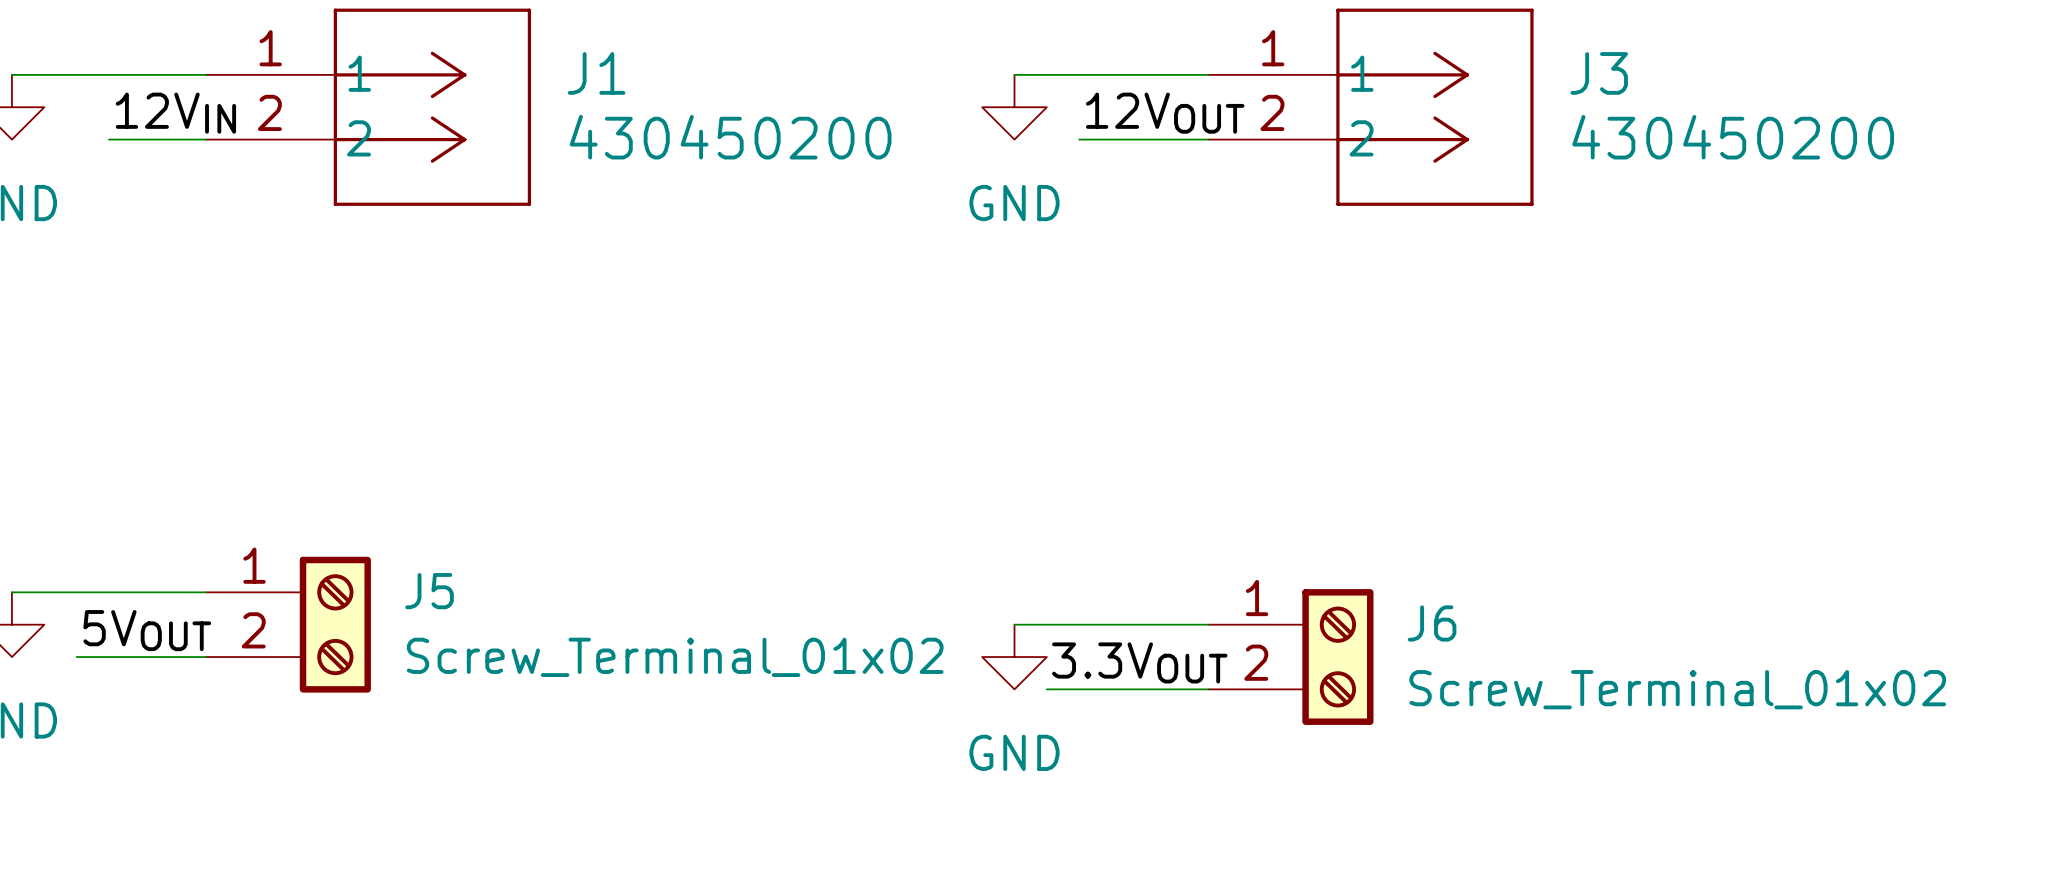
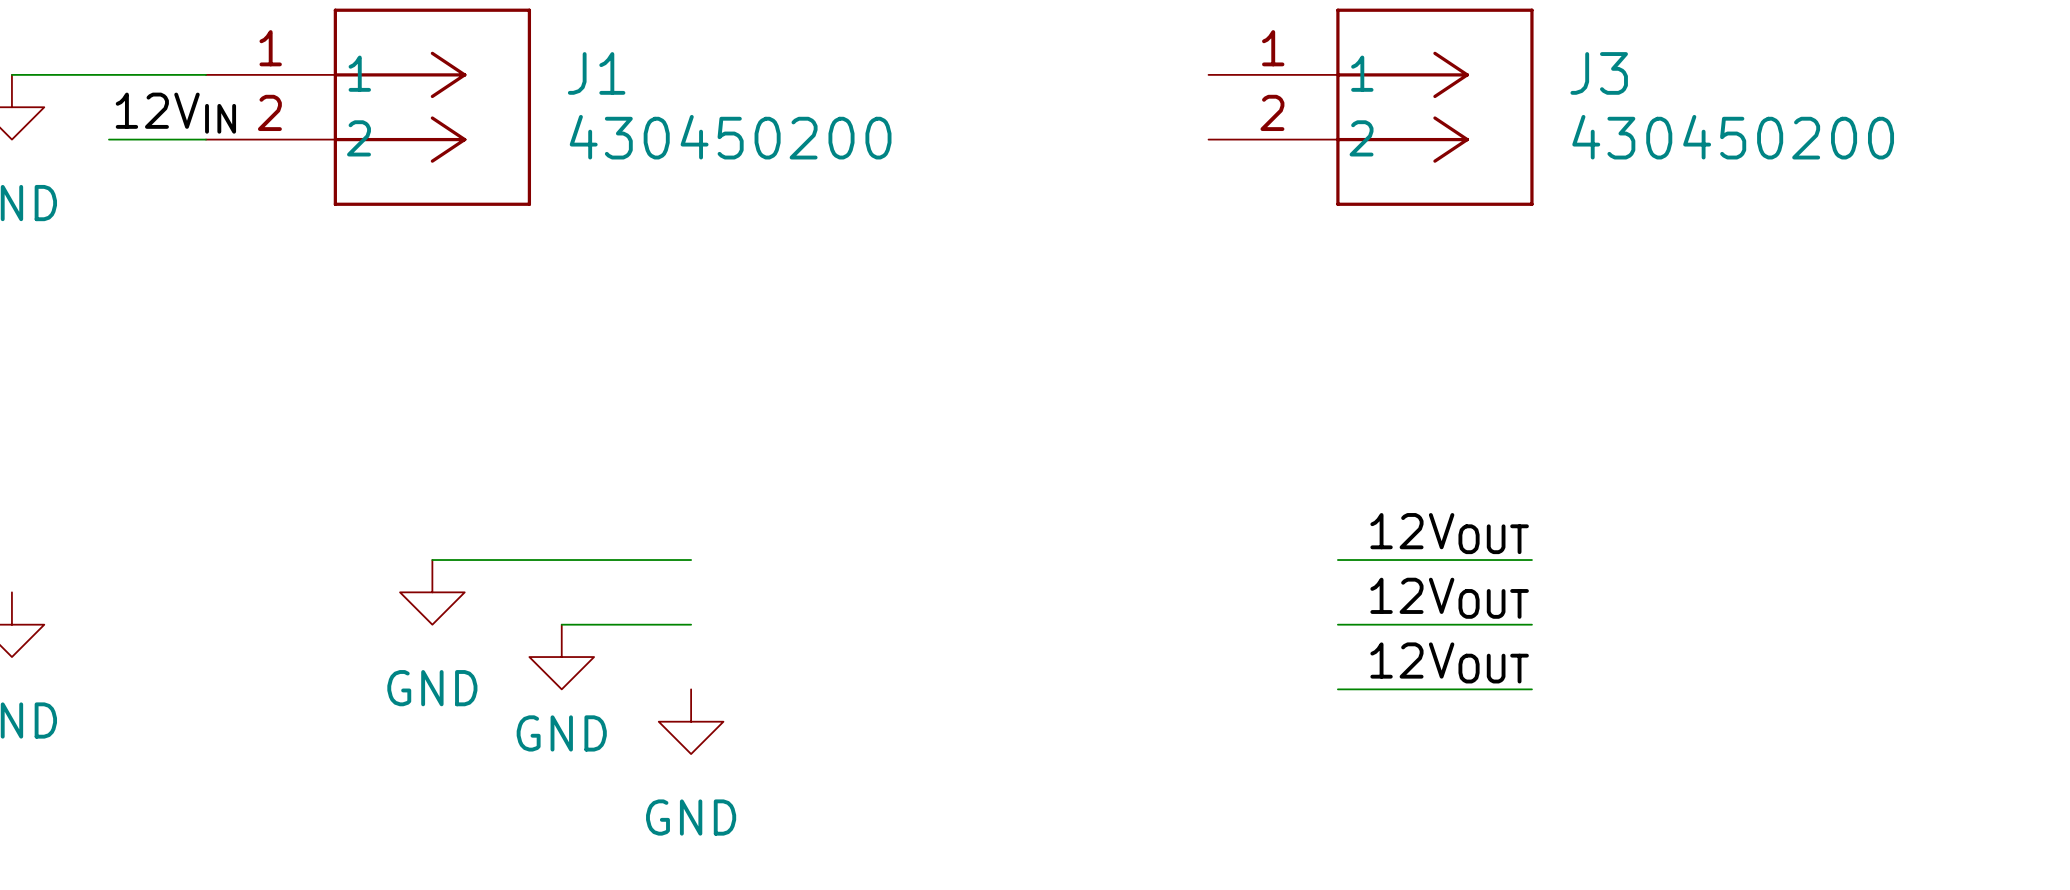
wire: (1014, 74) (1208, 74) -> (1337, 560) (1531, 560)
power symbol: GND (1014, 107) -> none
label: 12VOUT (1165, 113) -> none
wire: (1079, 139) (1208, 139) -> none
label: none -> 12VOUT (1449, 533)
wire: none -> (432, 560) (691, 560)
wire: (11, 592) (206, 592) -> none
power symbol: none -> GND (432, 592)
label: none -> 12VOUT (1449, 598)
J5: Screw_Terminal_01x02 (288, 624) -> none
wire: (1014, 624) (1208, 624) -> (1337, 624) (1531, 624)
label: 5VOUT (147, 630) -> none
wire: (76, 657) (206, 657) -> (561, 624) (691, 624)
power symbol: none -> GND (561, 657)
power symbol: GND (1014, 657) -> none
J6: Screw_Terminal_01x02 (1291, 657) -> none
label: 3.3VOUT (1139, 662) -> none
label: none -> 12VOUT (1449, 662)
wire: (1046, 689) (1208, 689) -> none
wire: none -> (1337, 689) (1531, 689)
power symbol: none -> GND (691, 721)

